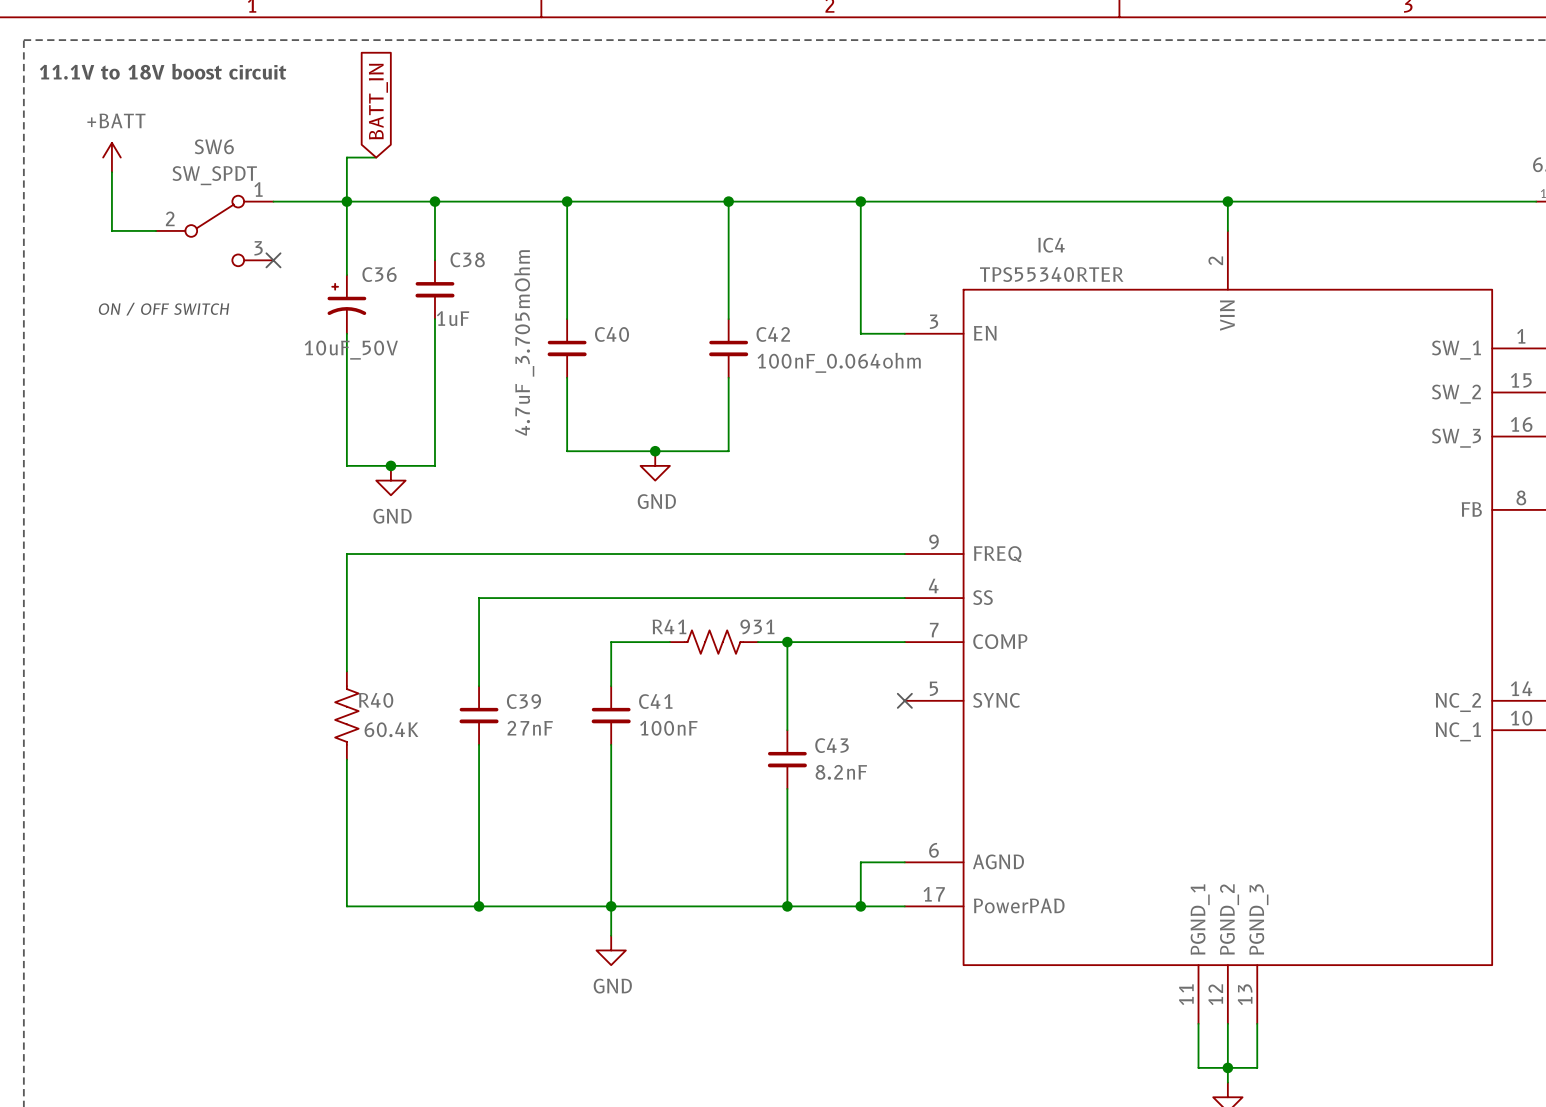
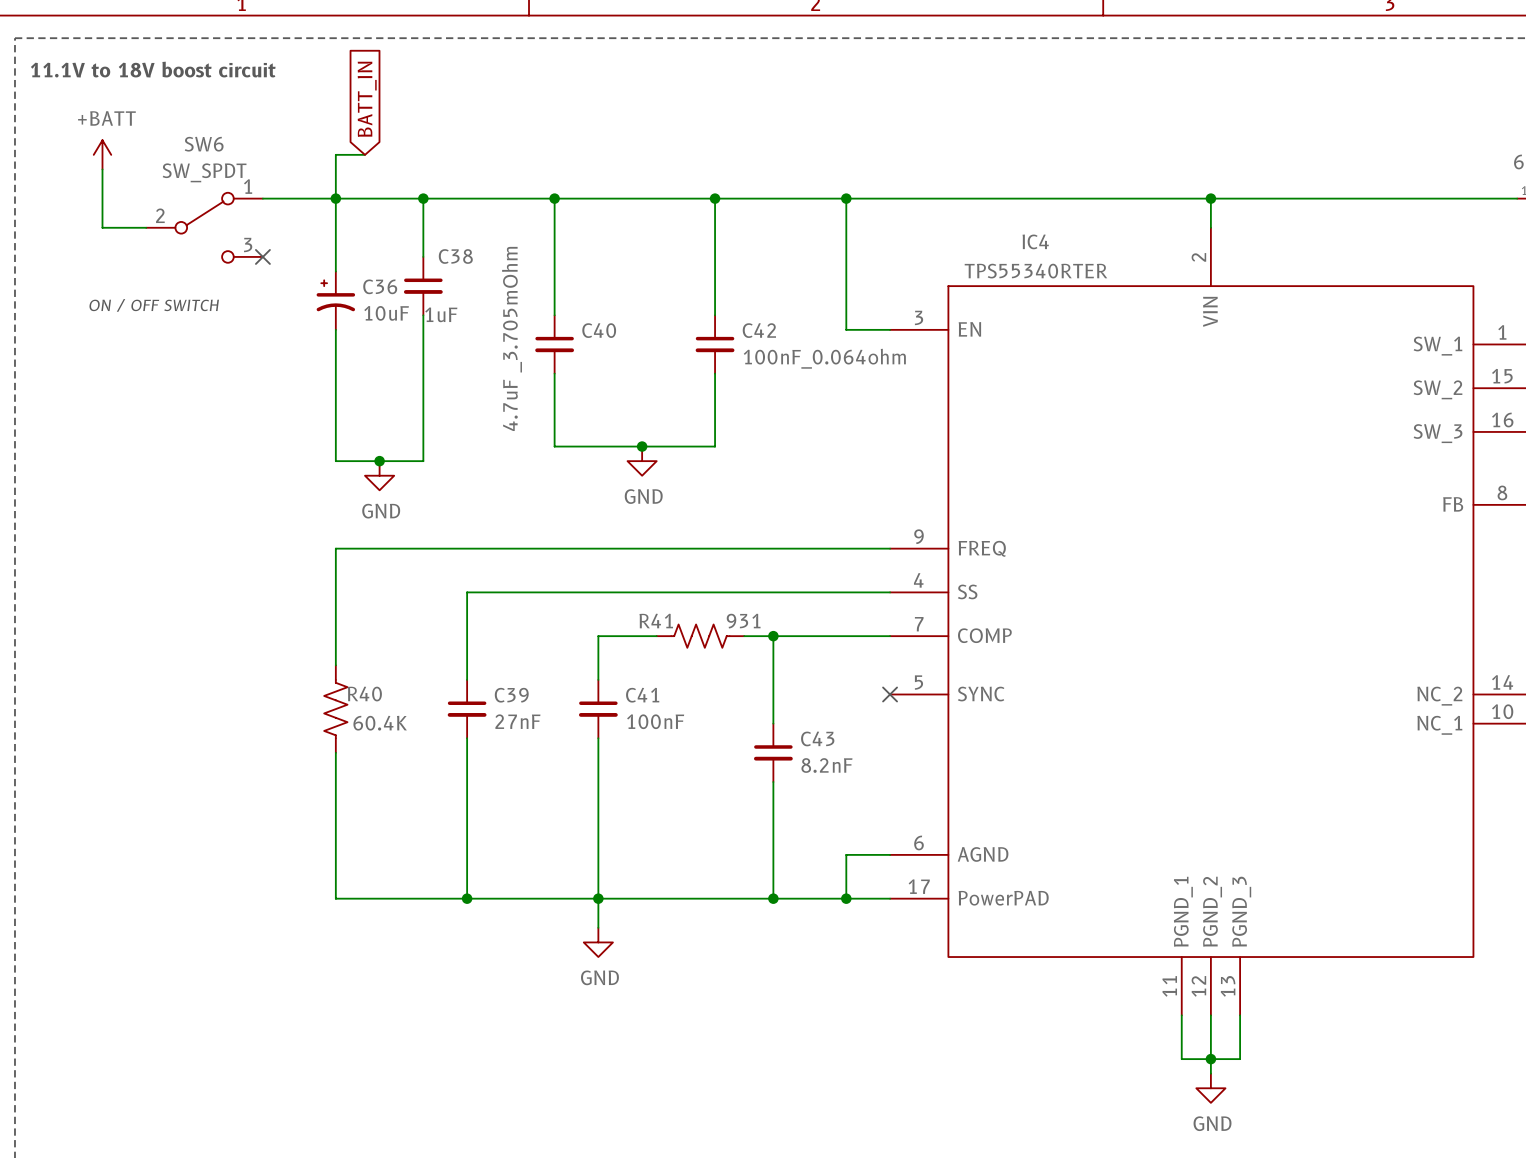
C36 name position: C36 (379, 274) -> C36 (380, 286)
C36 value: 10uF_50V (351, 350) -> 10uF (386, 313)

